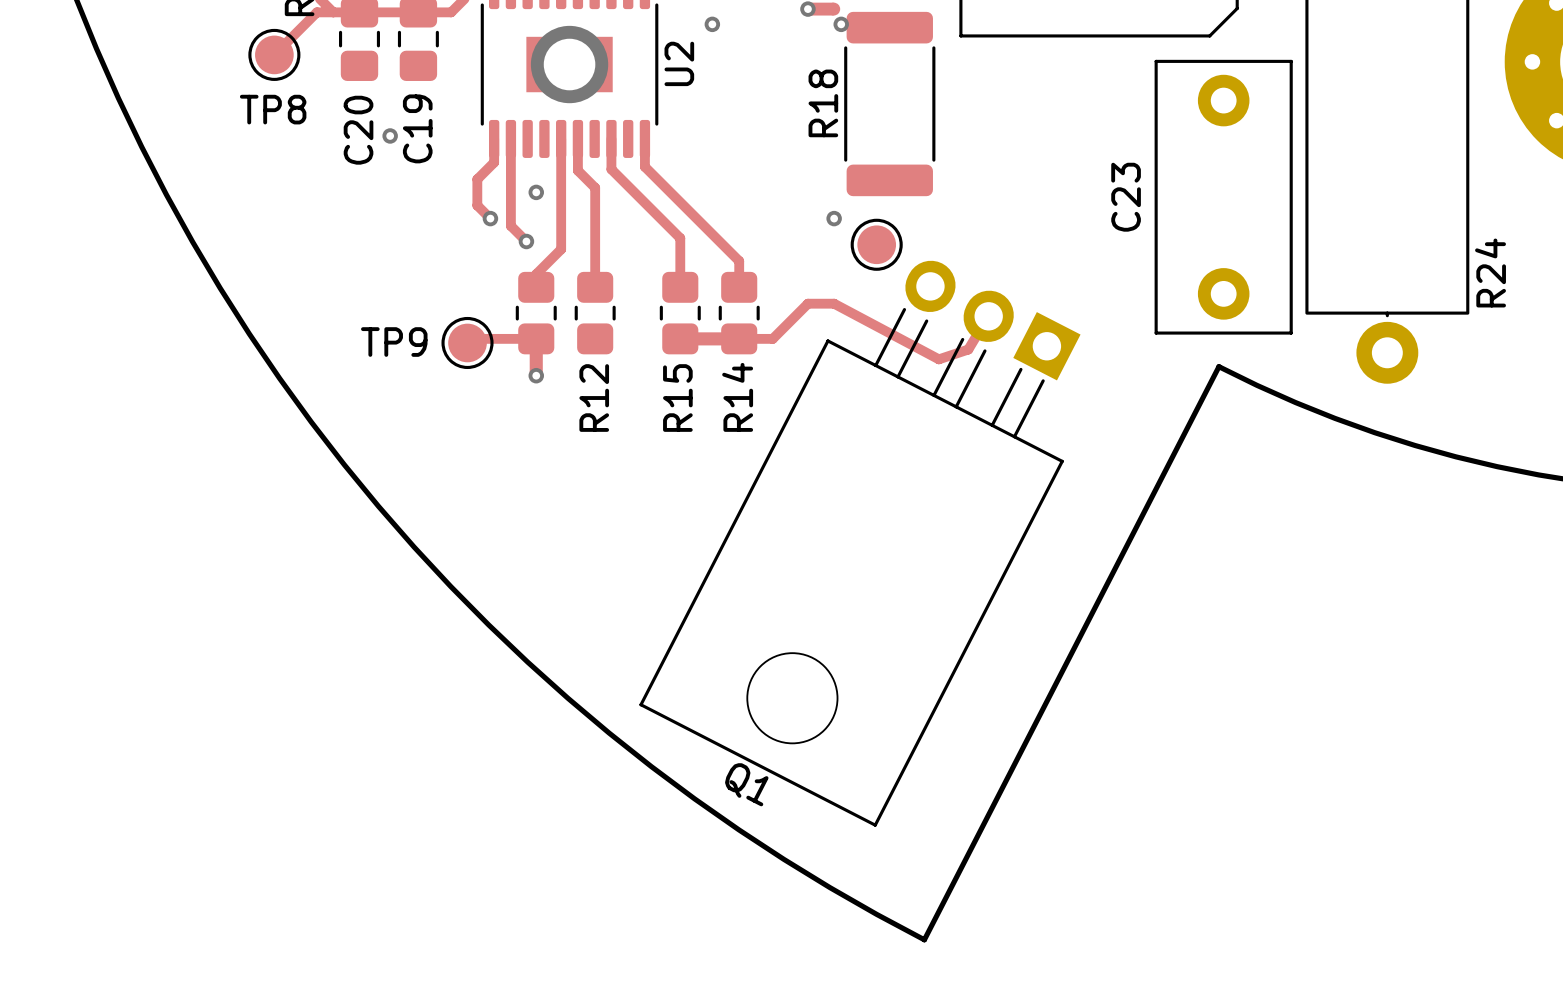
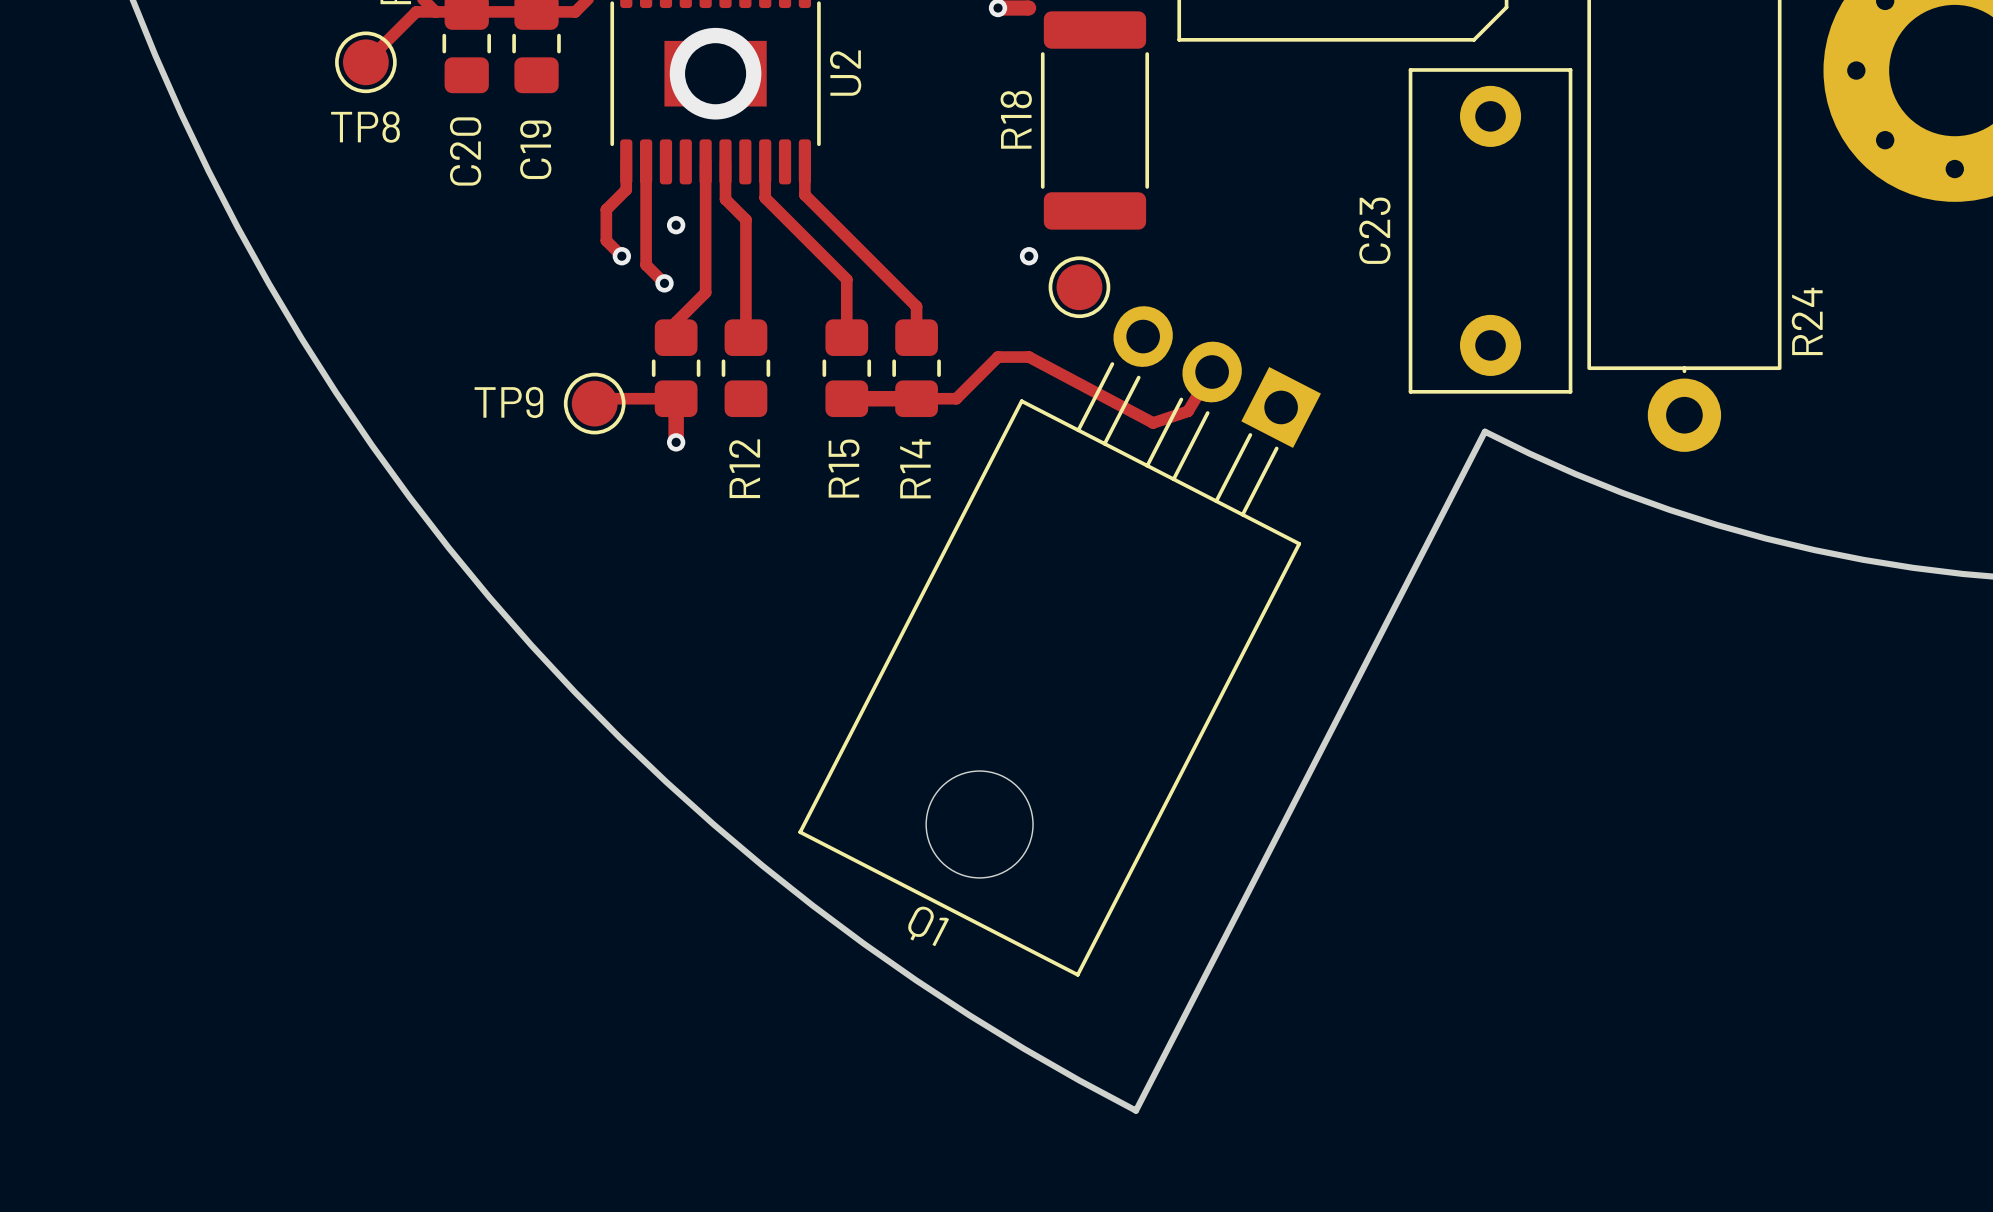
via: (712, 24) -> none
via: (841, 24) -> none
via: (390, 135) -> none

